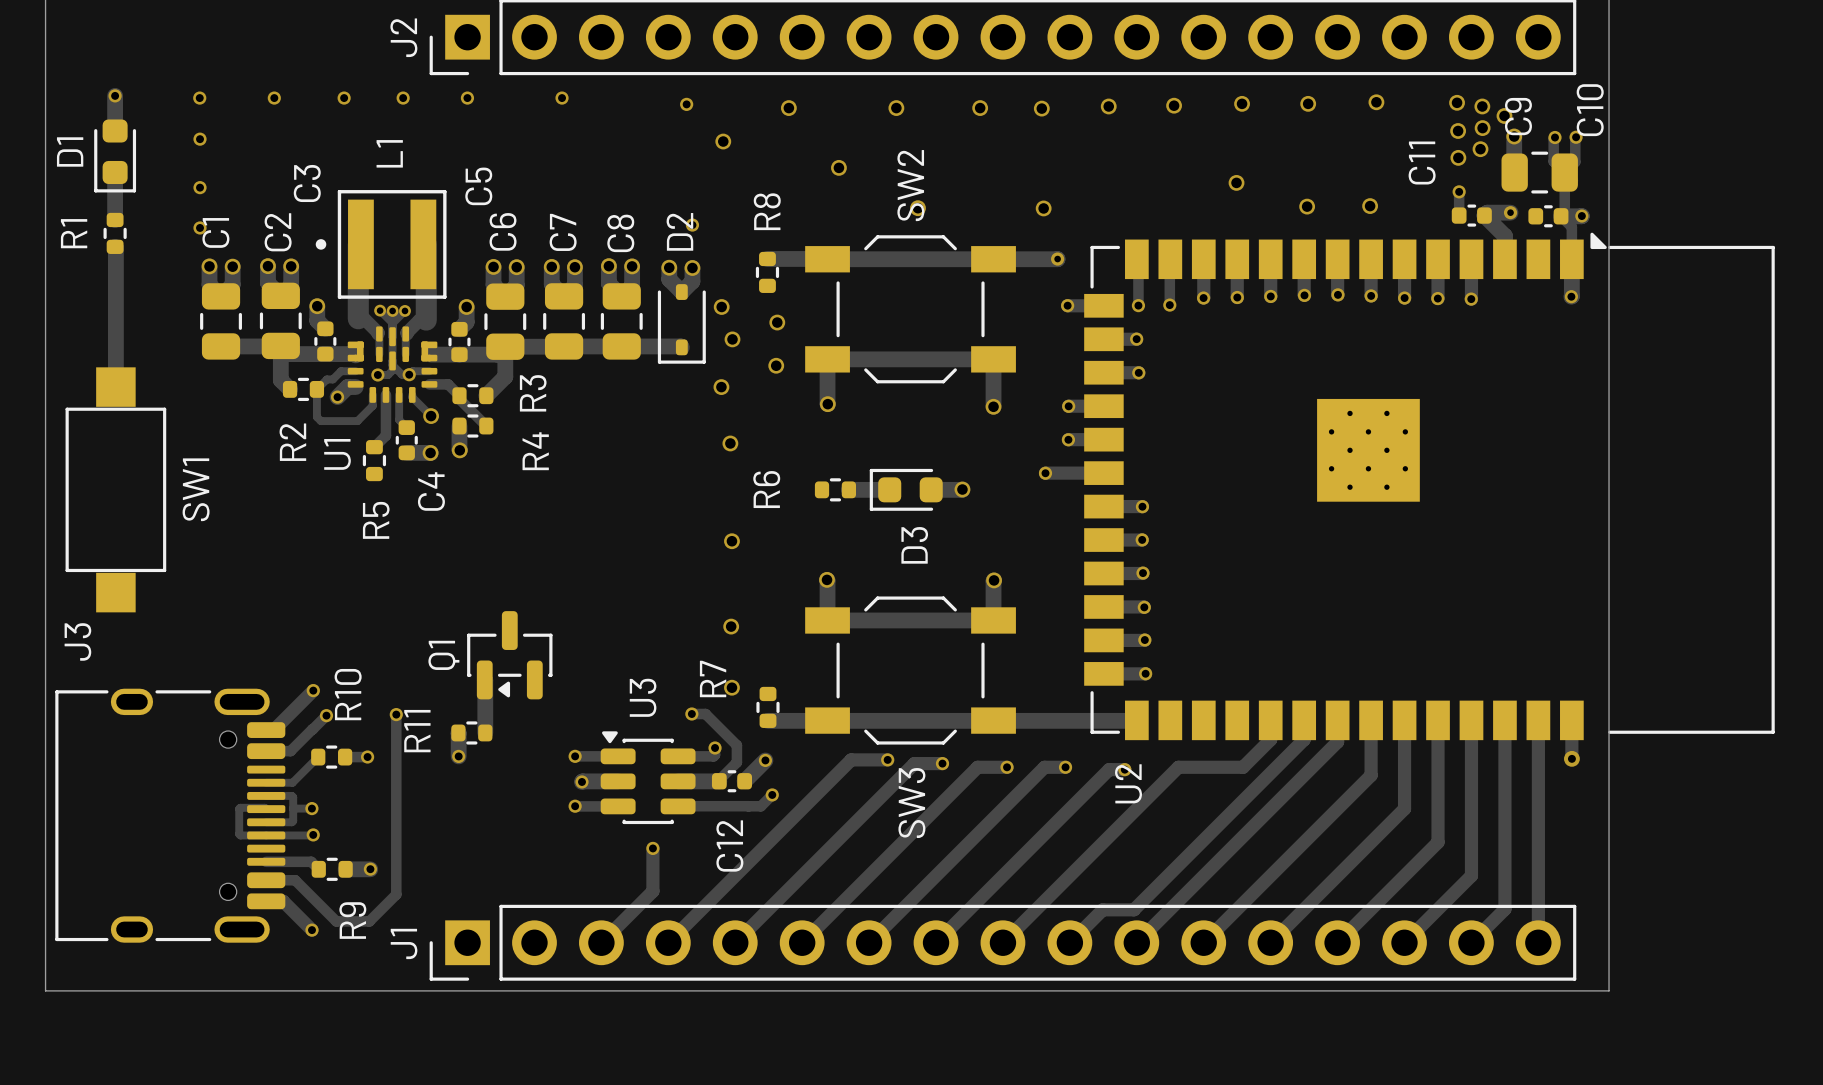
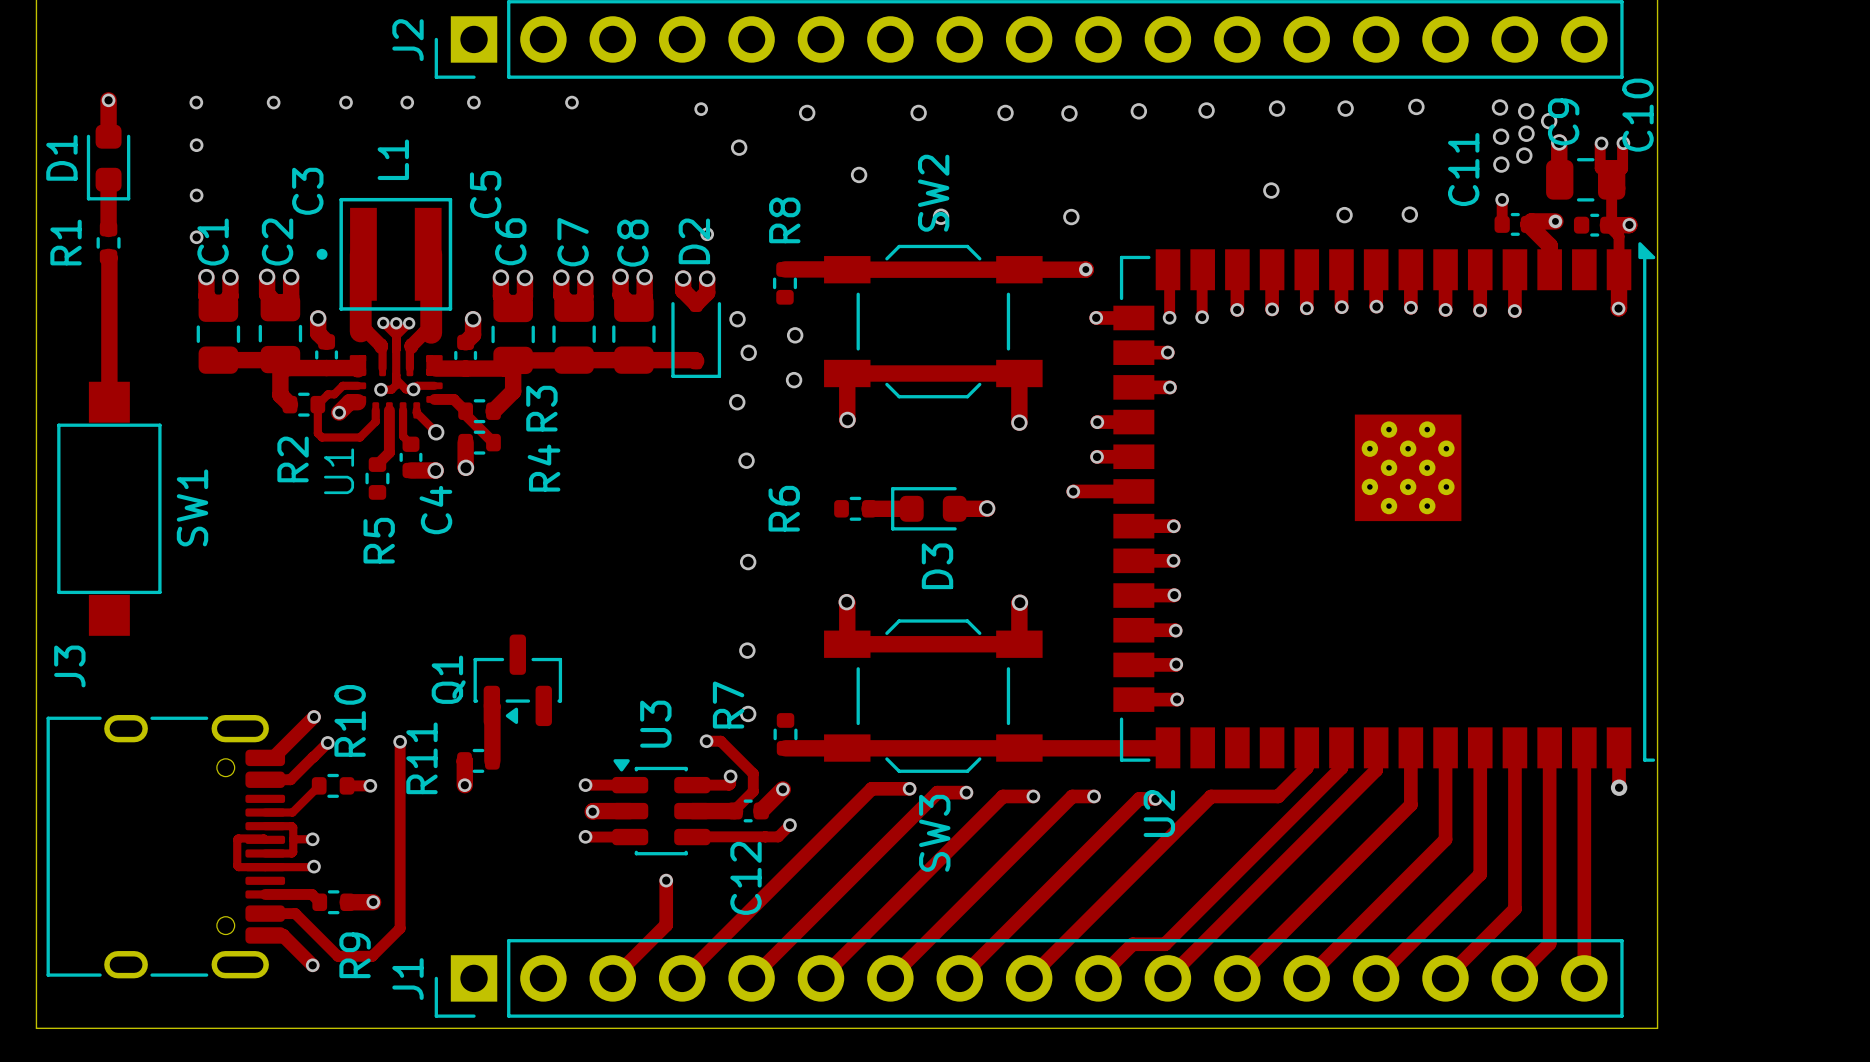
U2 footprint: [1084, 232, 1775, 741] -> [1113, 242, 1656, 769]

